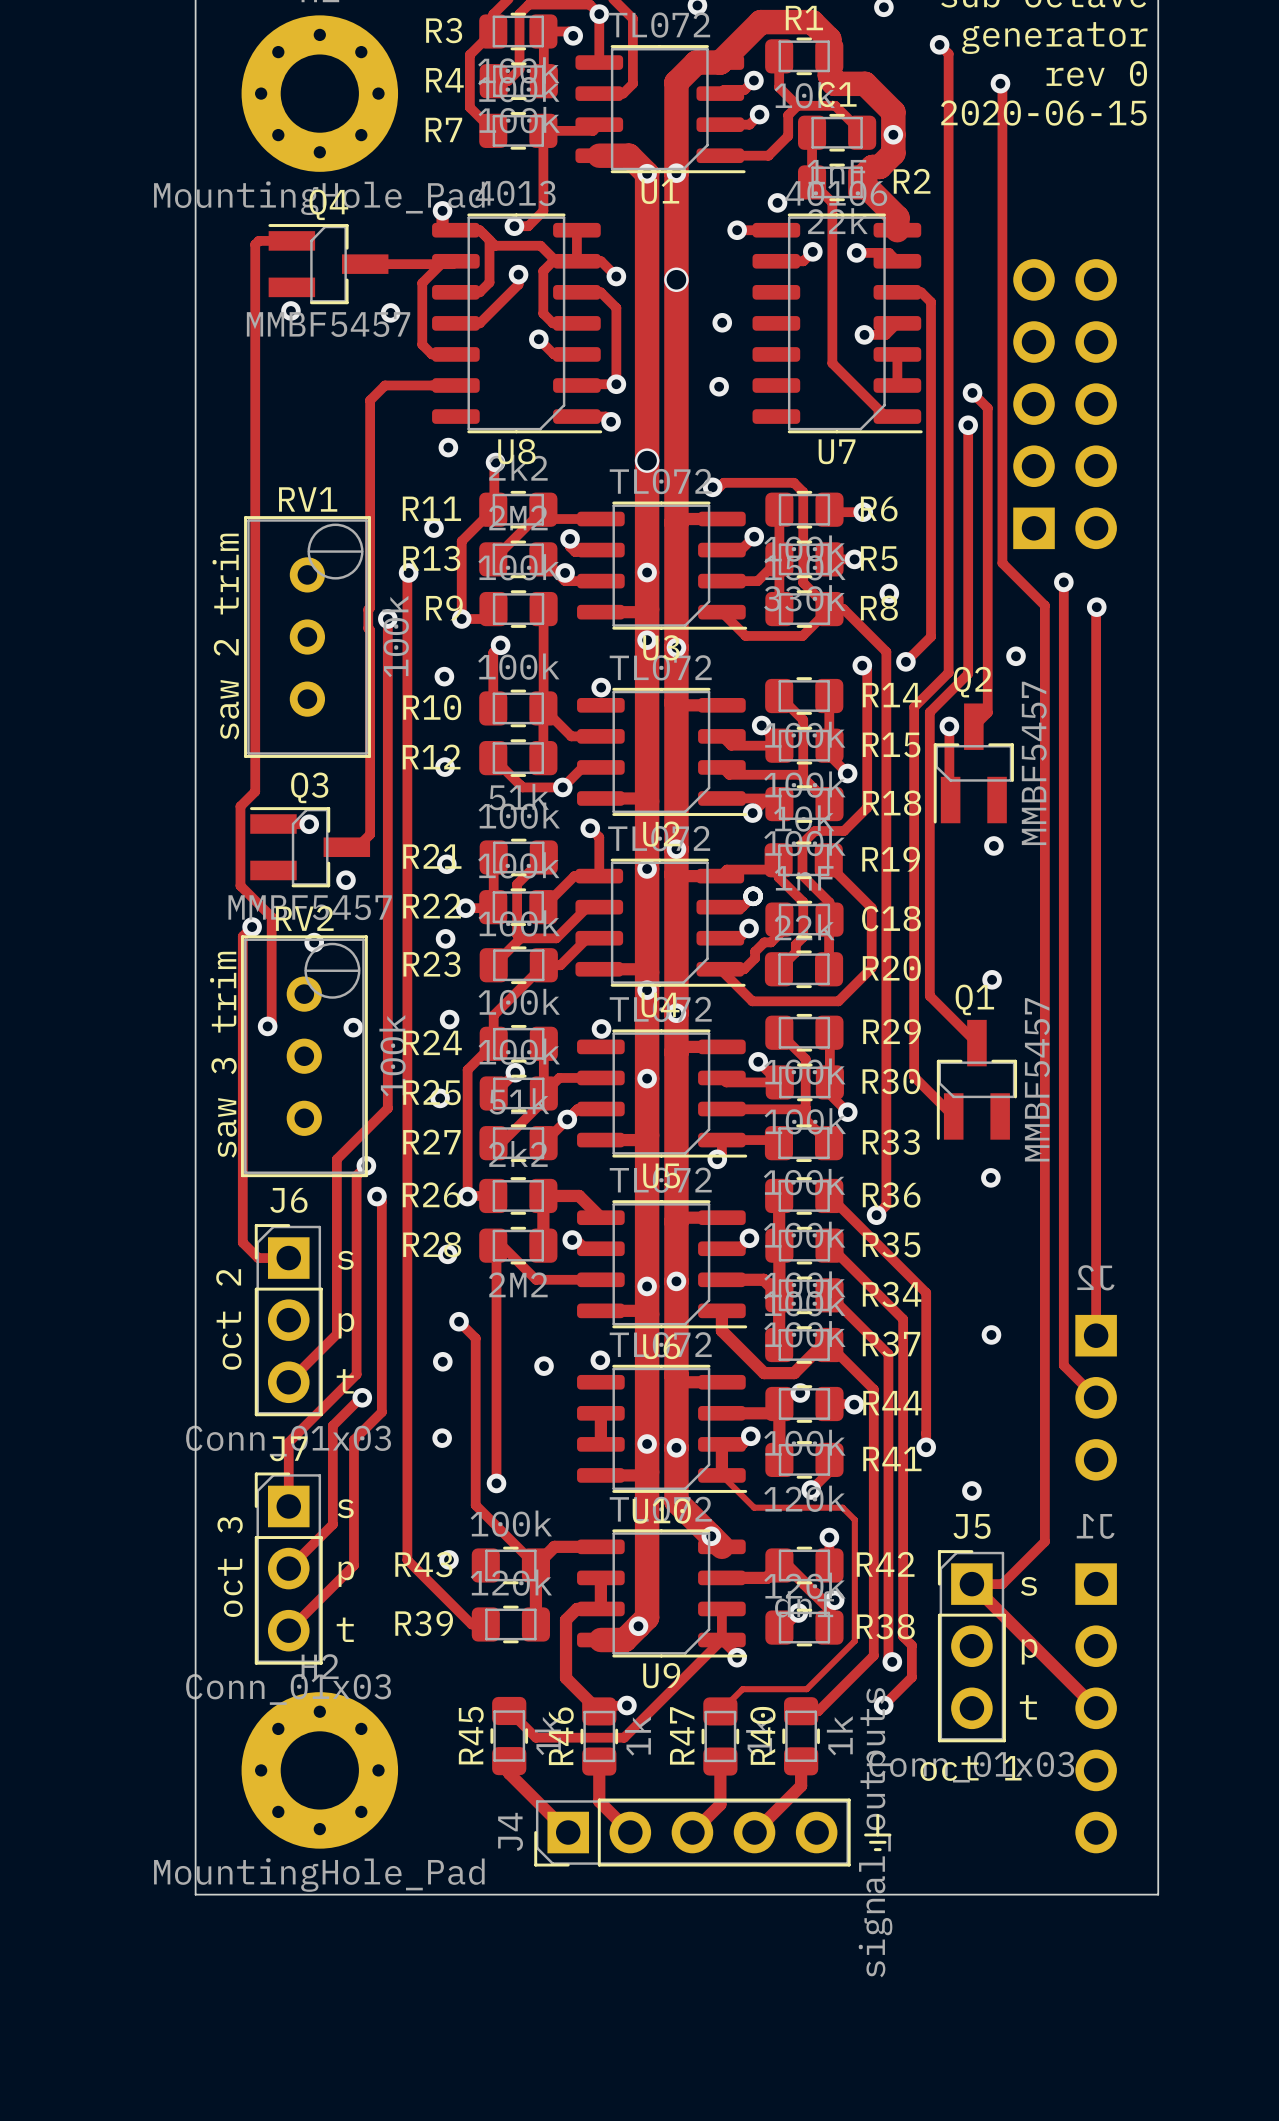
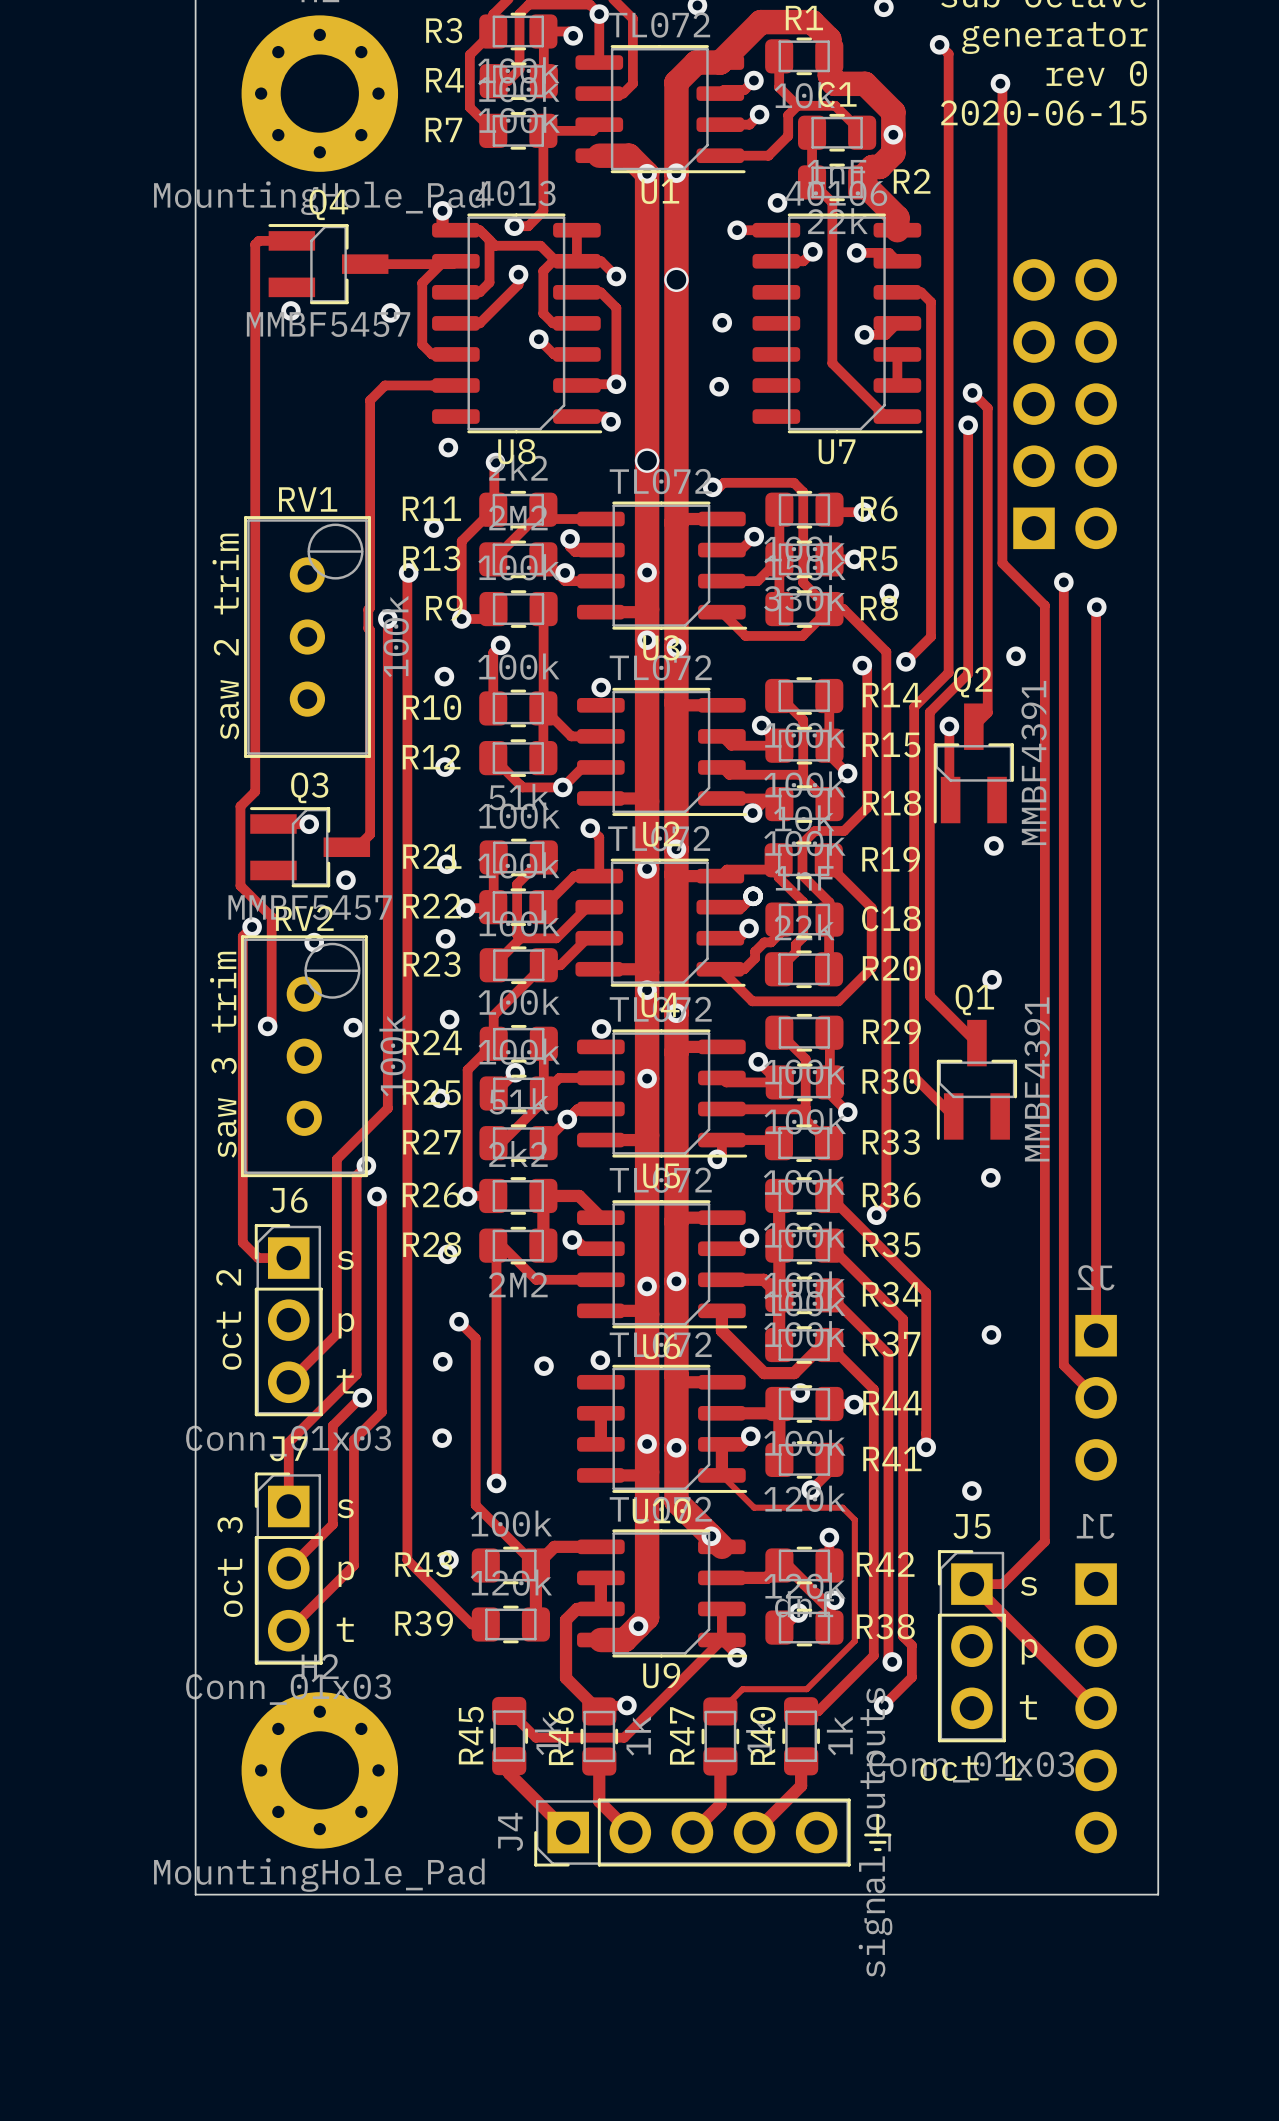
Q2 value: MMBF5457 (1034, 763) -> MMBF4391 (1034, 763)
Q1 value: MMBF5457 (1037, 1079) -> MMBF4391 (1037, 1079)

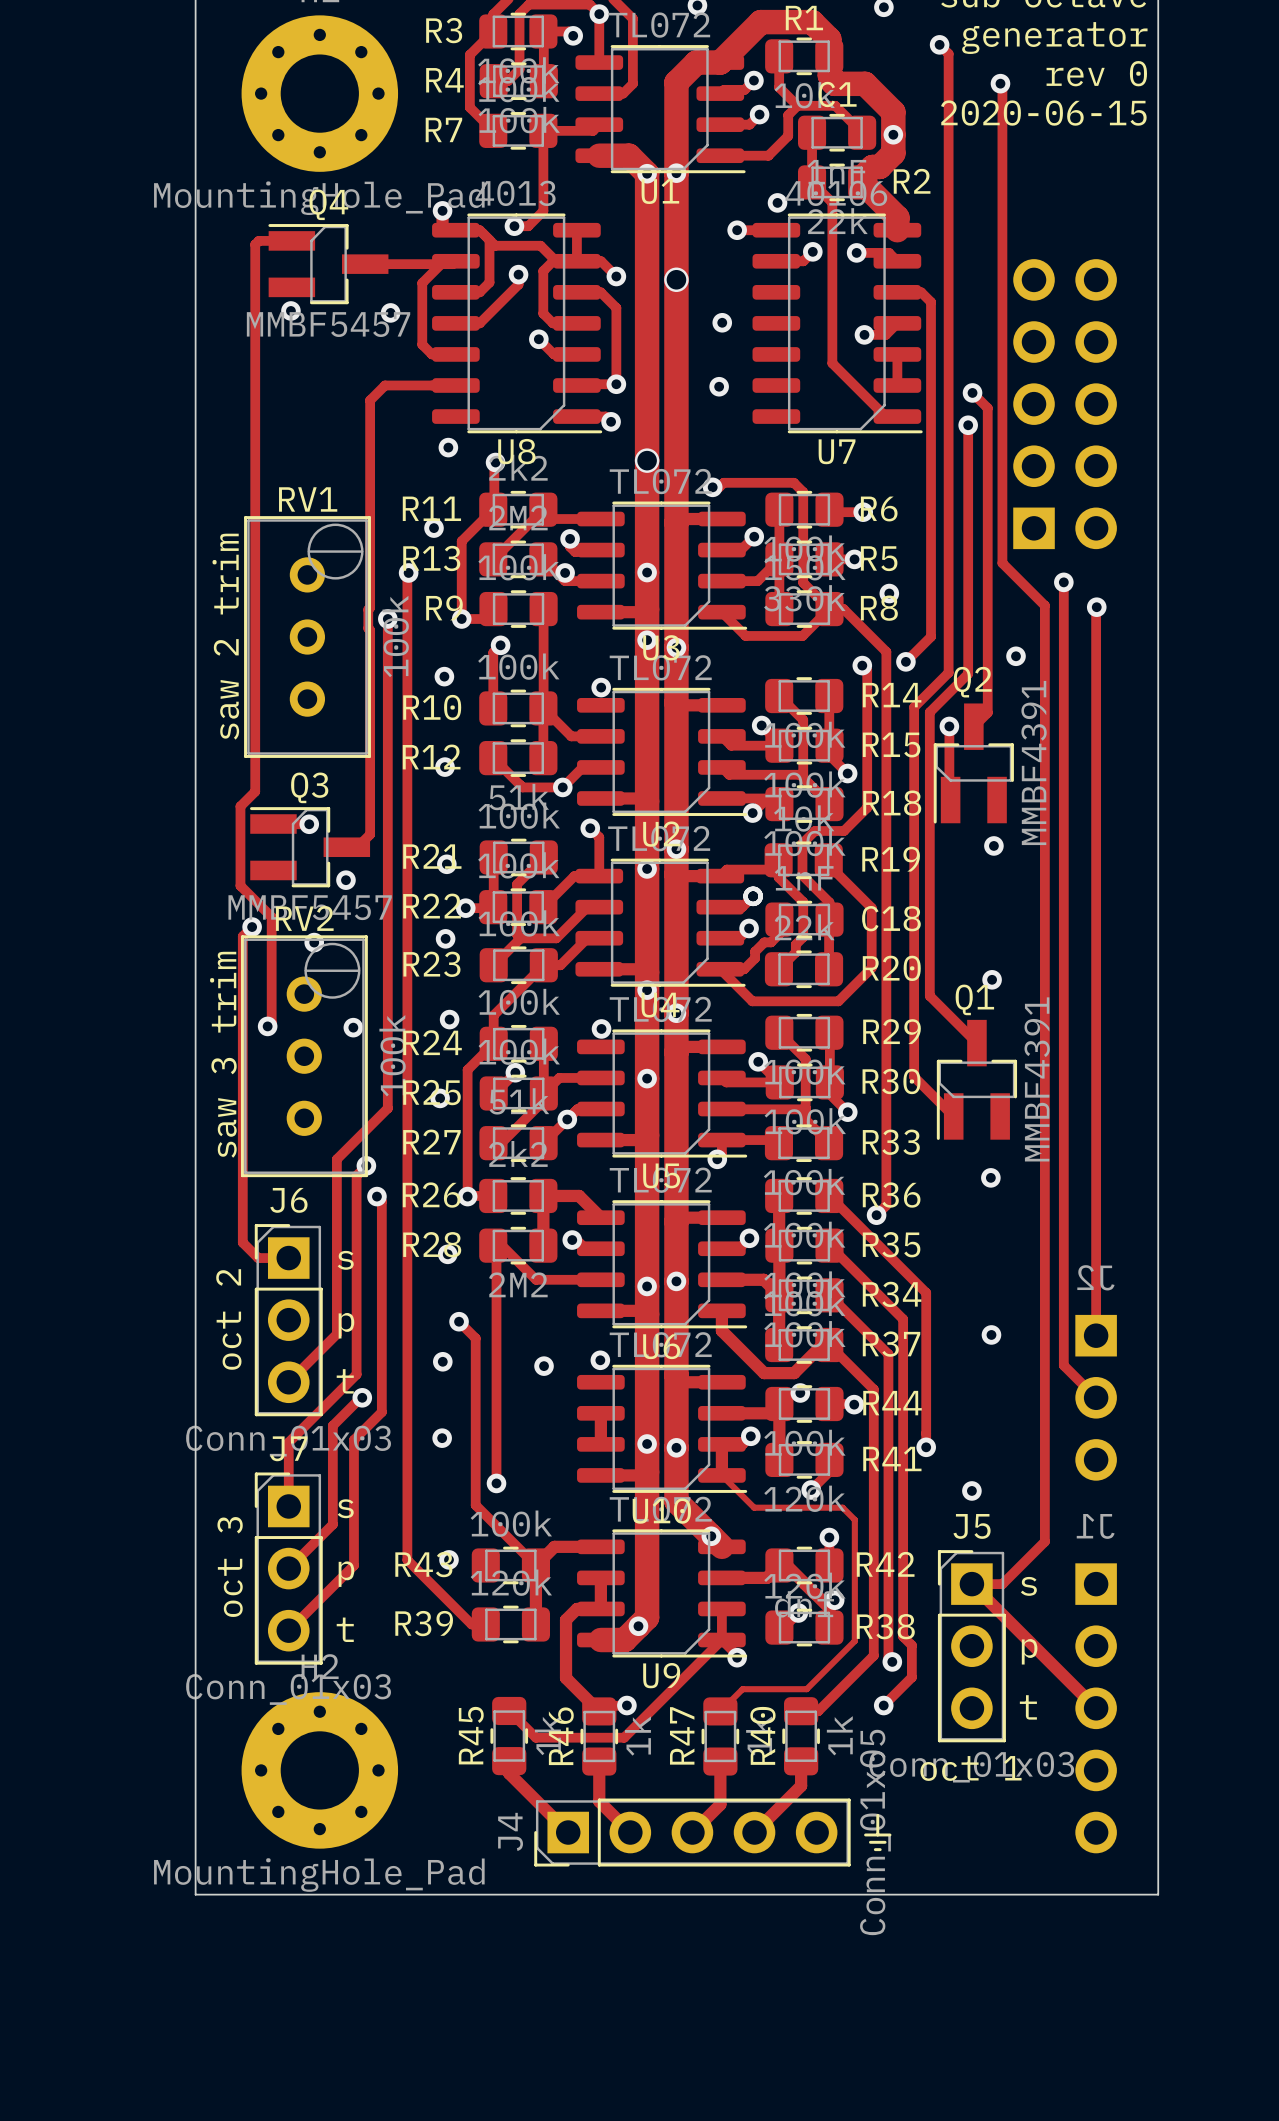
J4 value: signal_outputs (875, 1832) -> Conn_01x05 (875, 1832)

